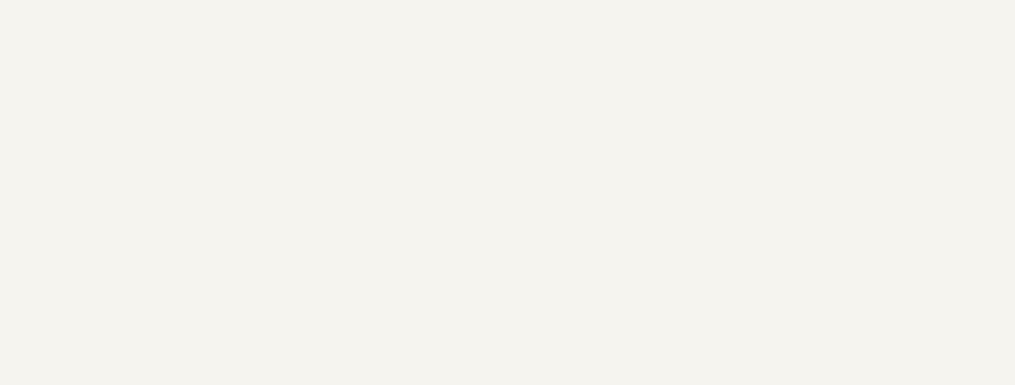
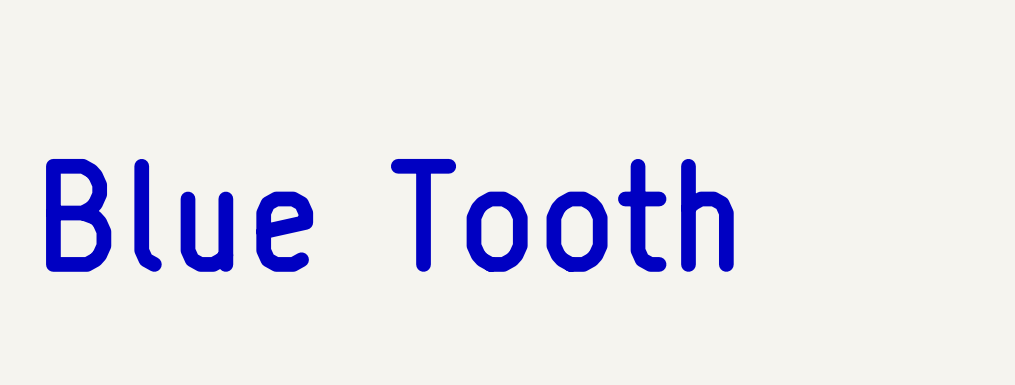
text: none -> Blue Tooth (389, 215)

